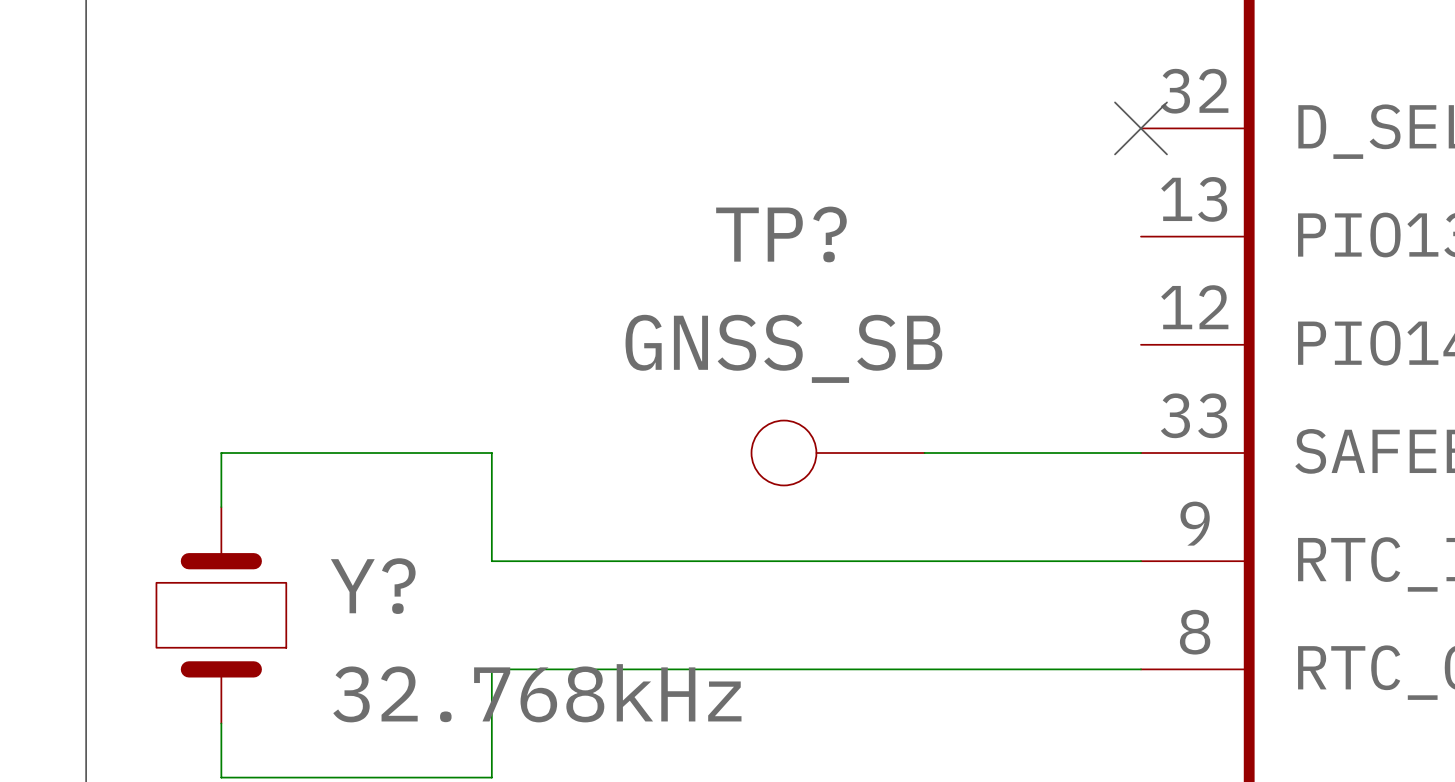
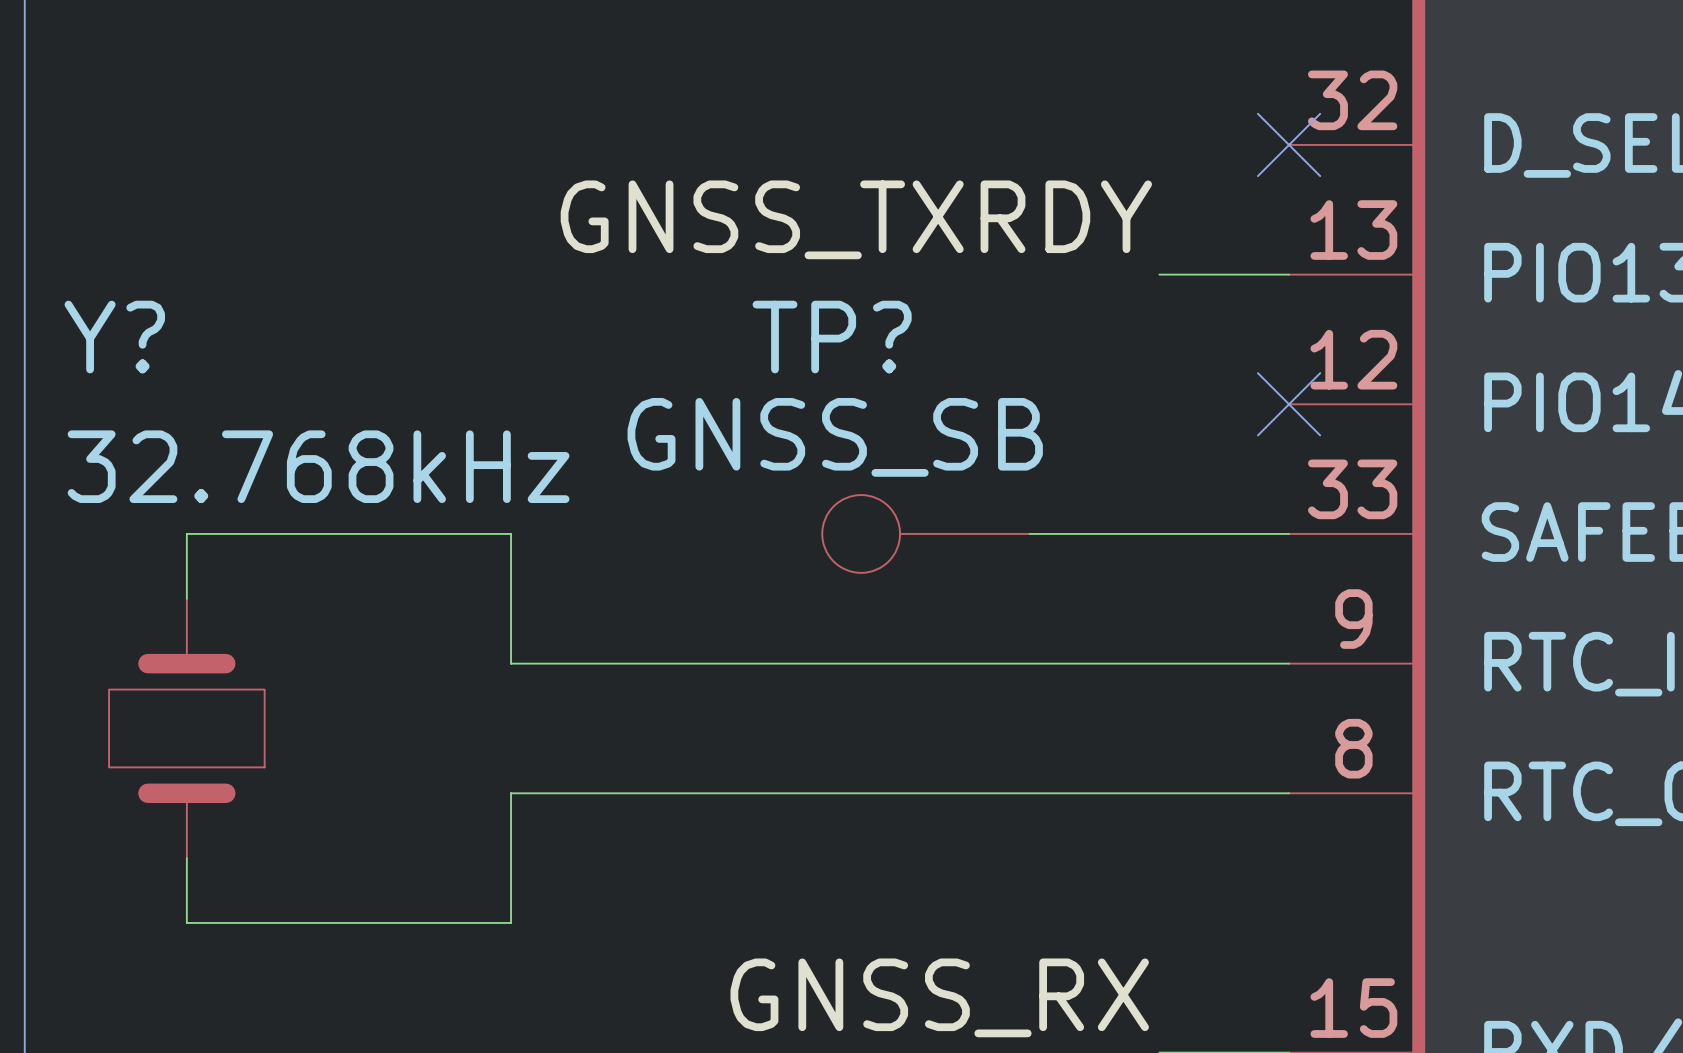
label: none -> GNSS_TXRDY (856, 219)
TP? name position: TP? (781, 234) -> TP? (832, 337)
wire: none -> (1159, 274) (1289, 274)
no-connect mark: none -> (1289, 404)
TP? value position: GNSS_SB (783, 348) -> GNSS_SB (835, 437)
Y? name position: Y? (373, 586) -> Y? (114, 337)
Y? value position: 32.768kHz (537, 693) -> 32.768kHz (318, 466)

